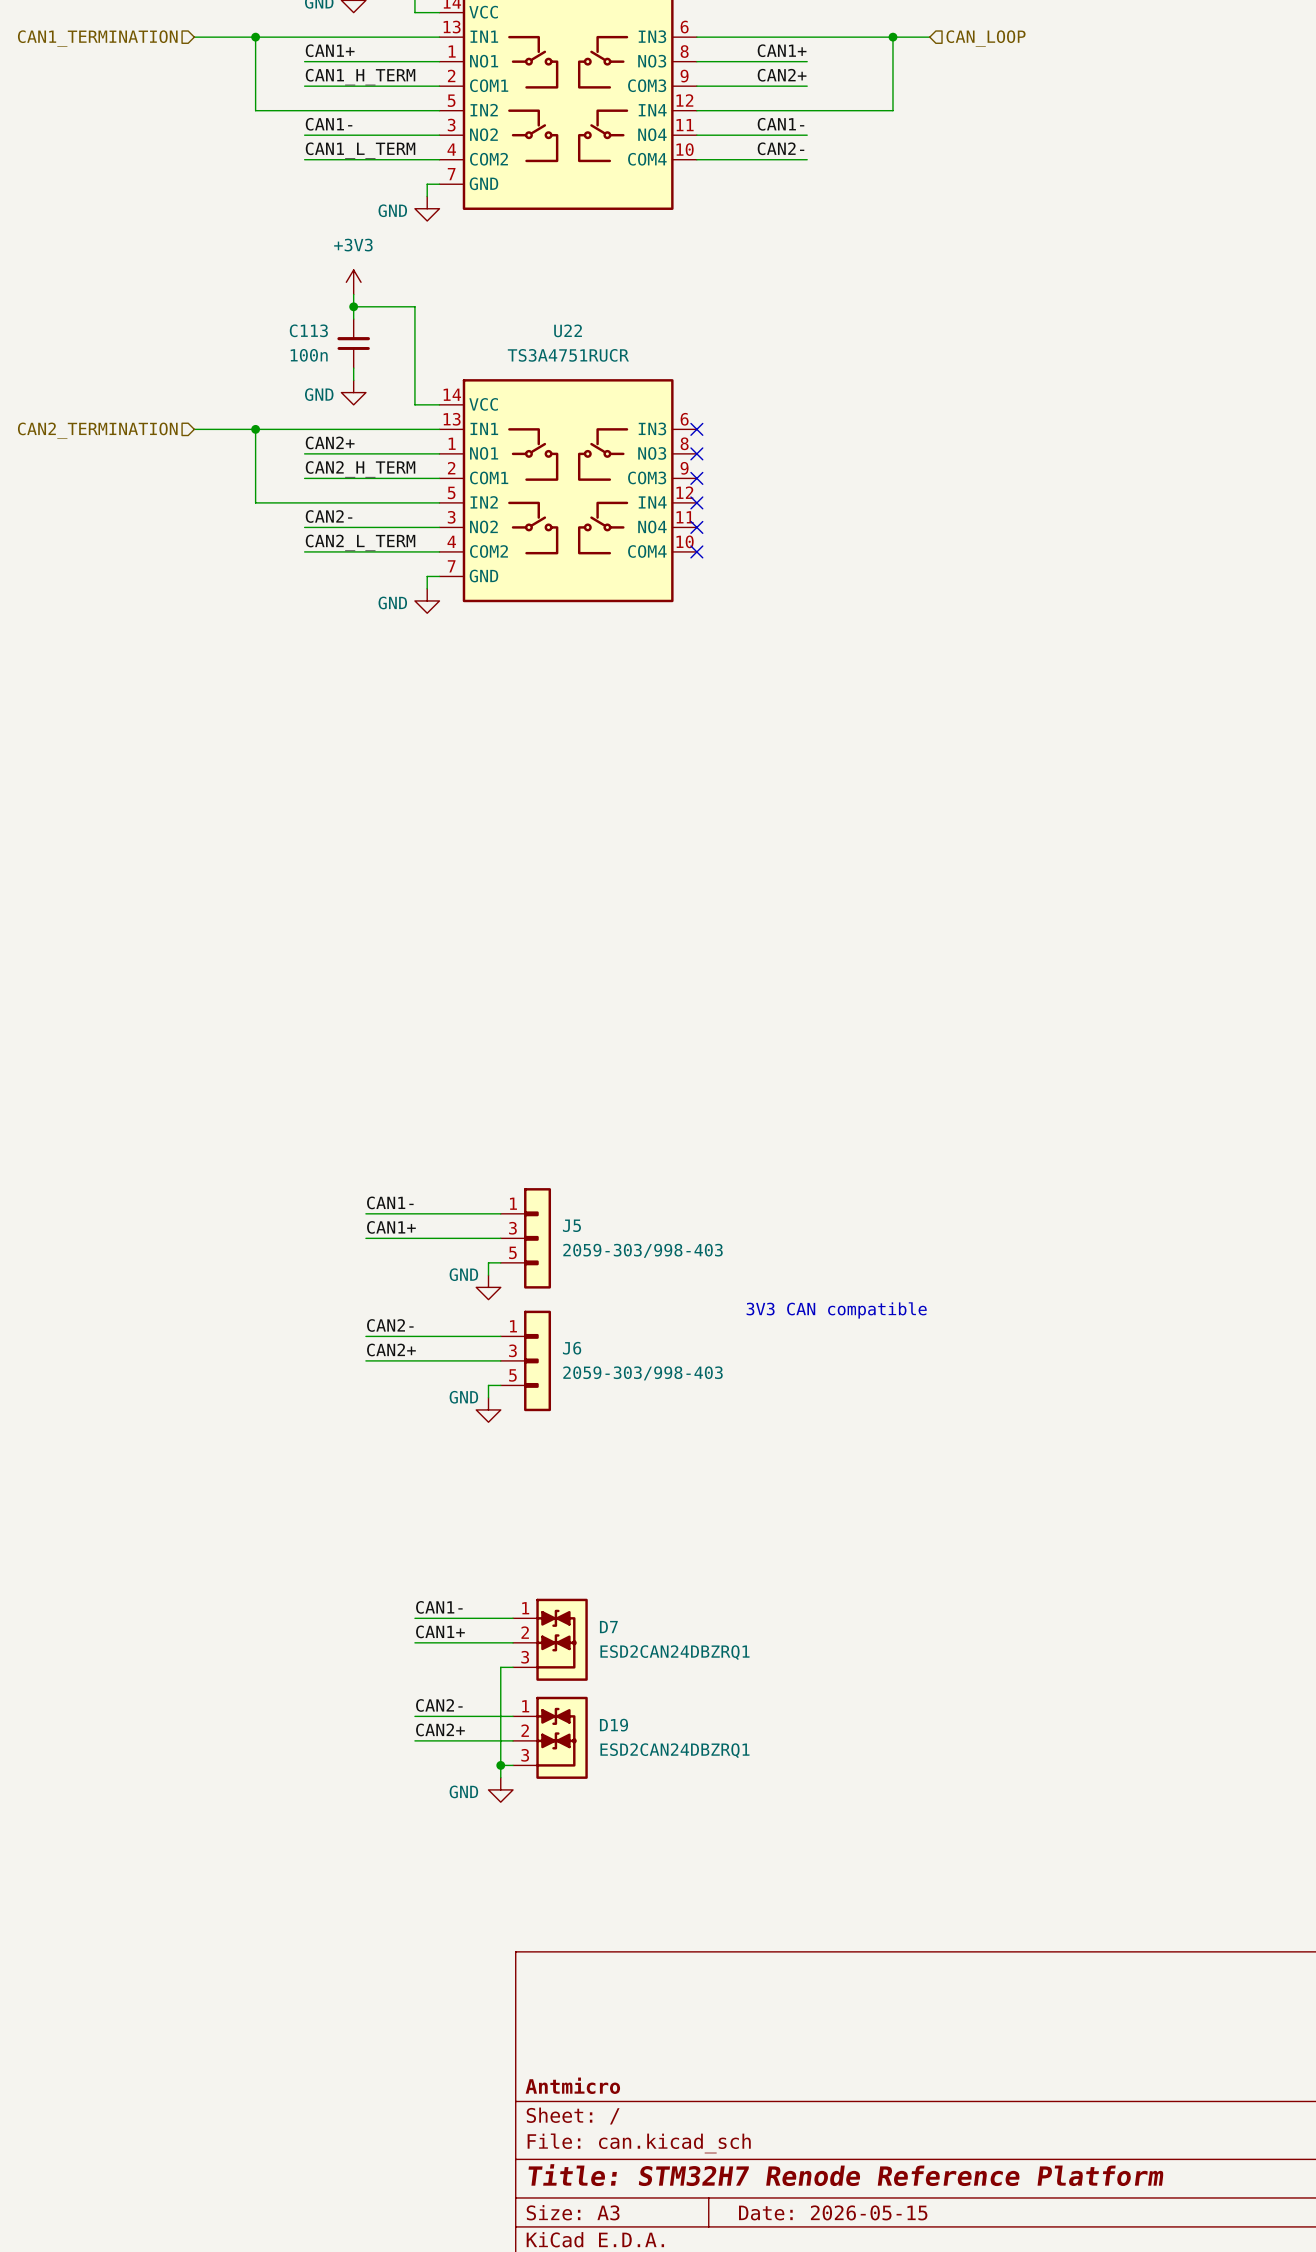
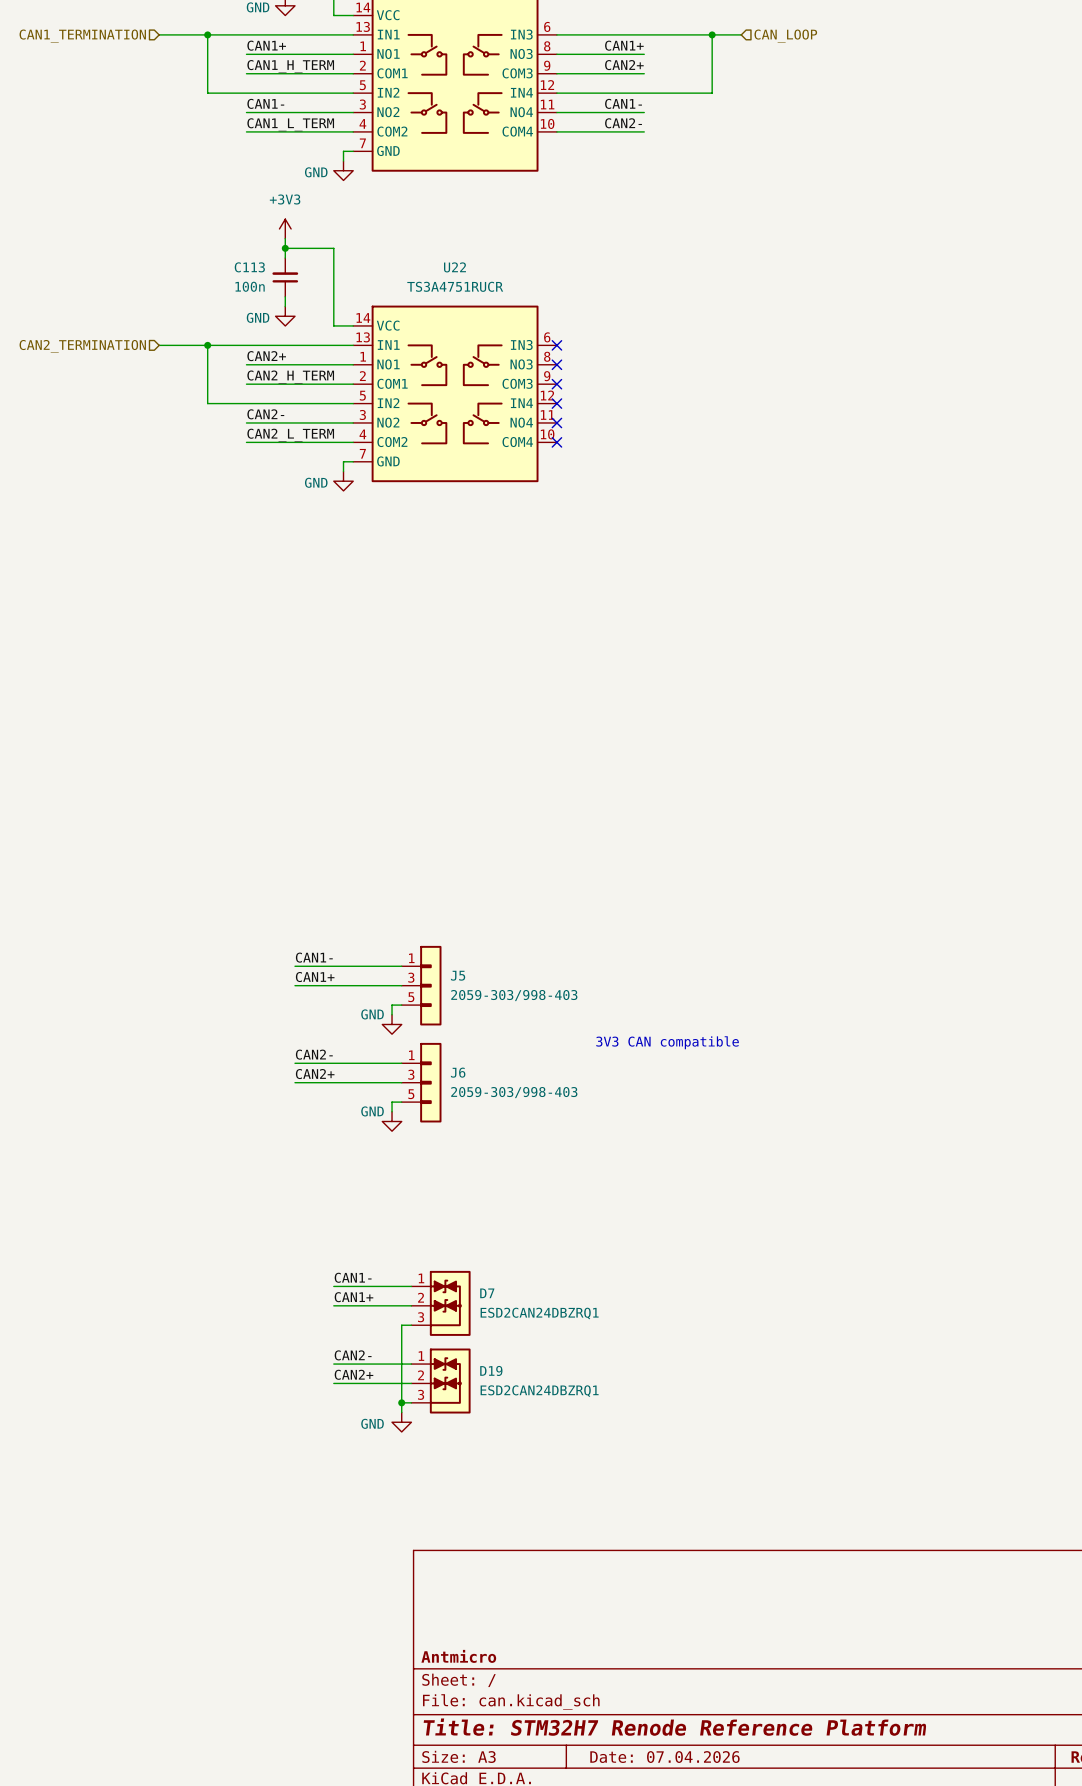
title block: Date: 2026-05-15 (833, 2212) -> Date: 07.04.2026 (664, 1757)

